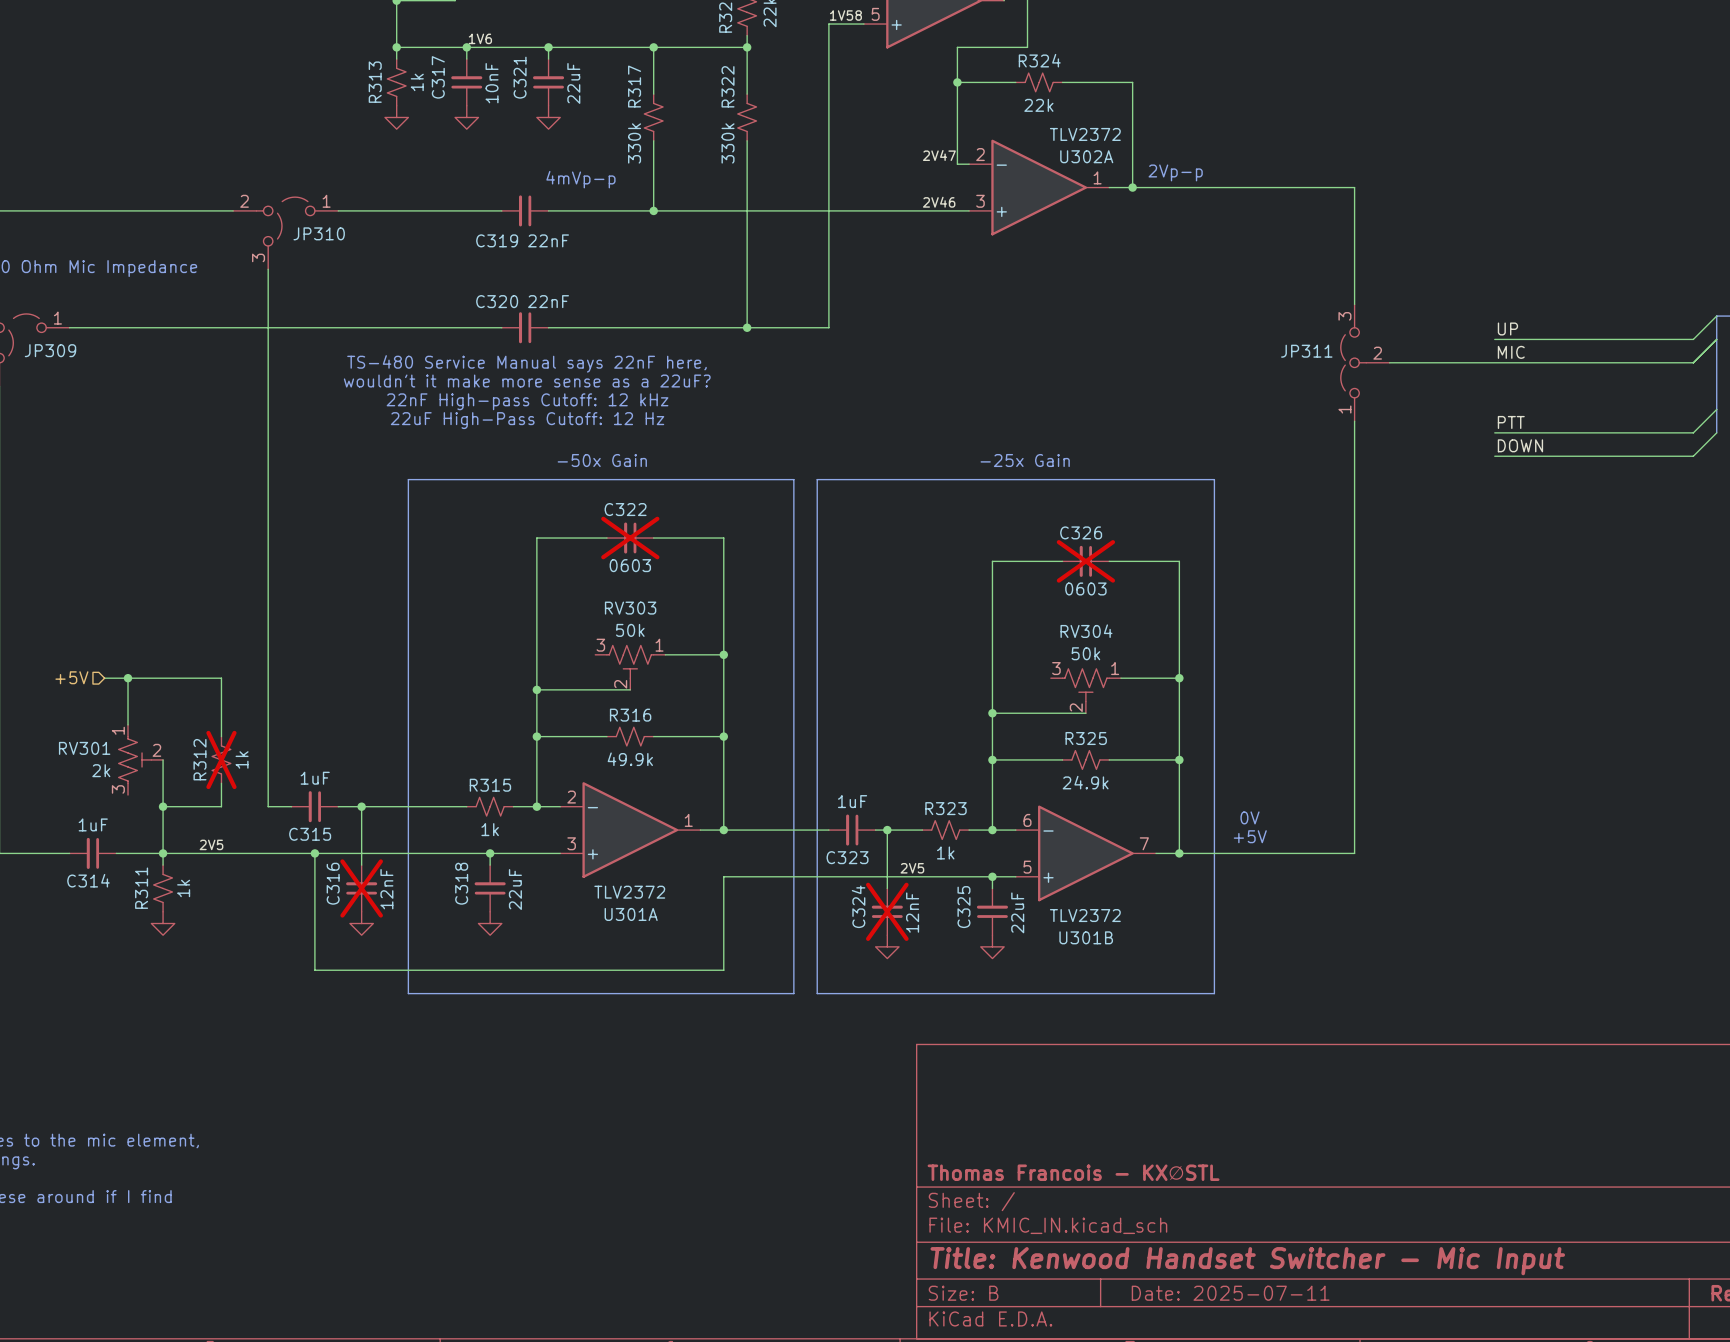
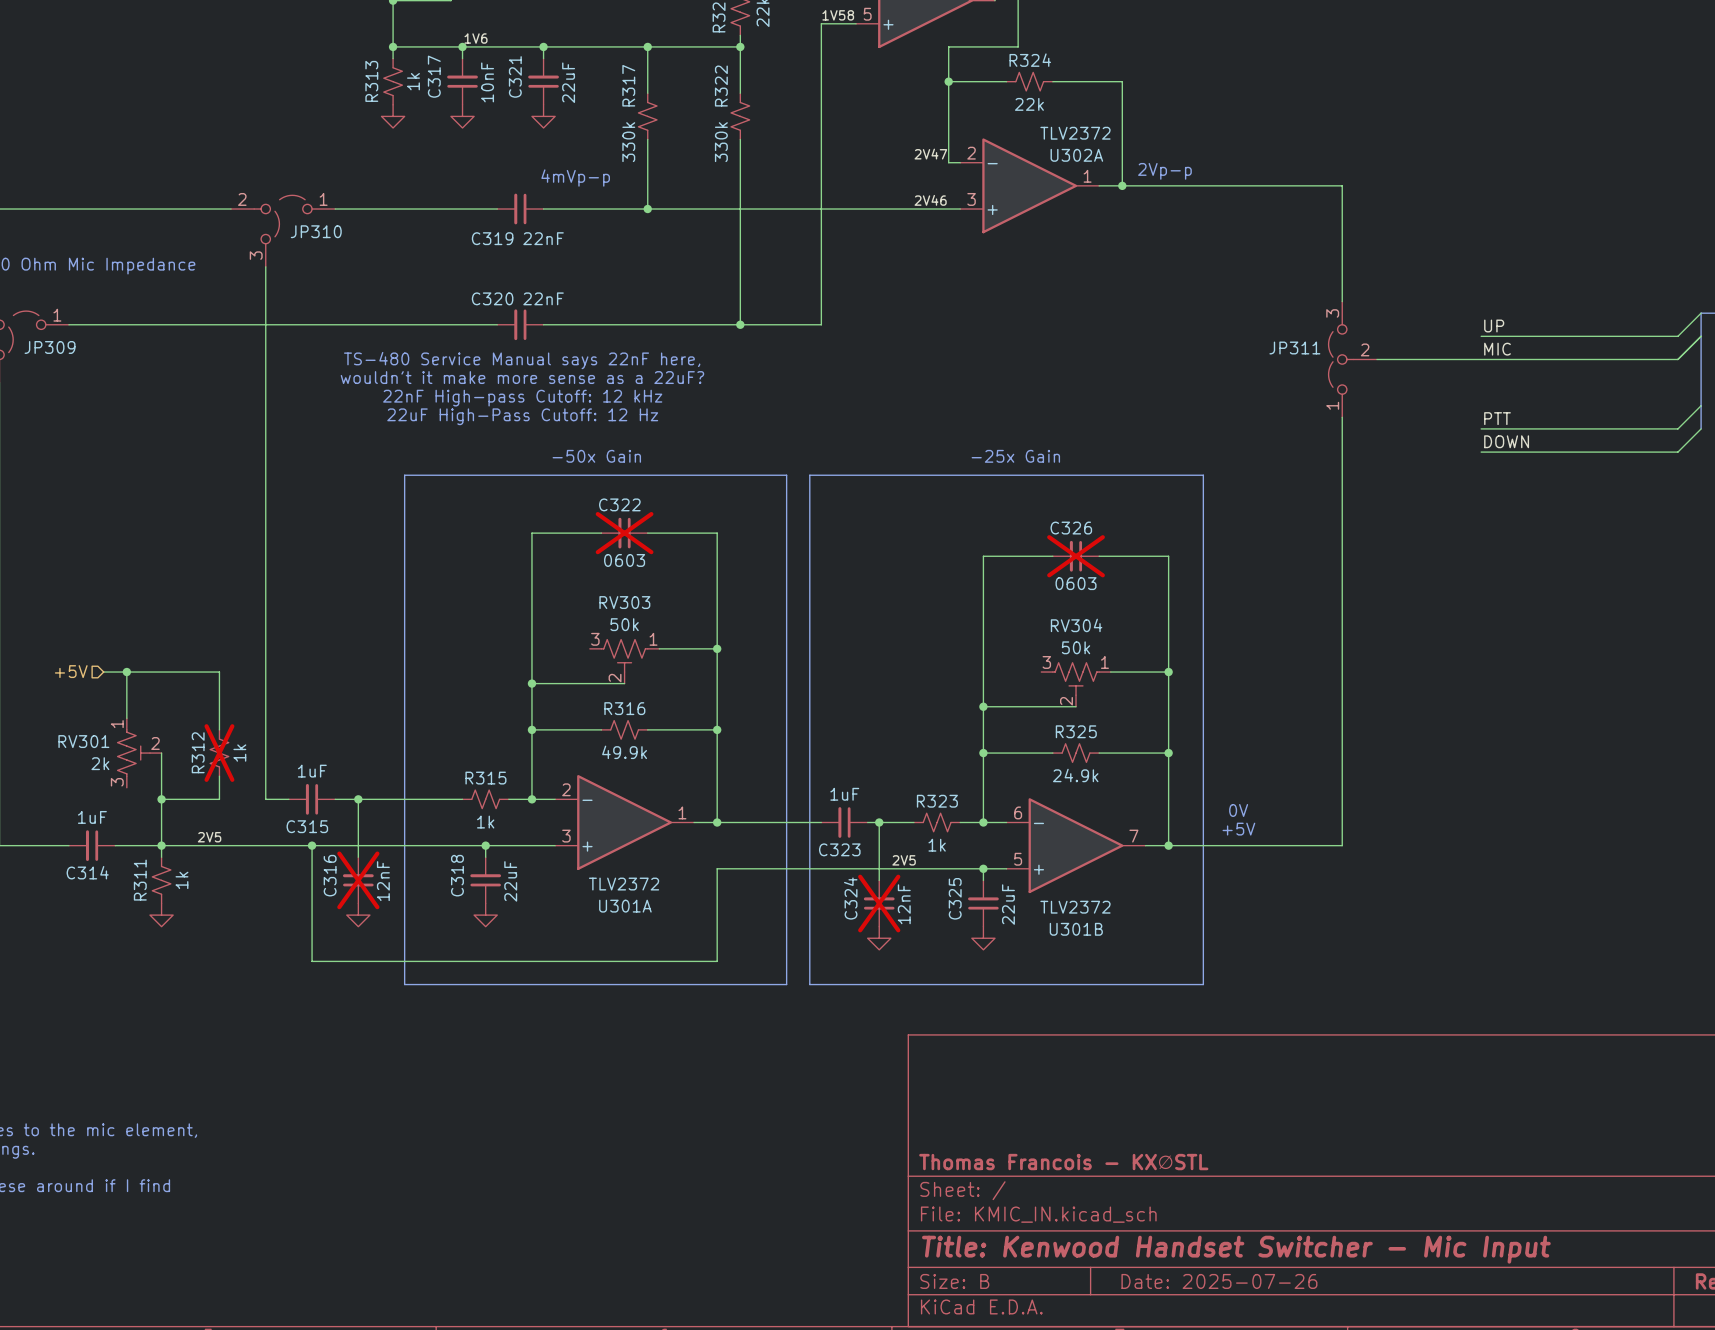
title block: Date: 2025-07-11 (1230, 1293) -> Date: 2025-07-26 (1219, 1281)

